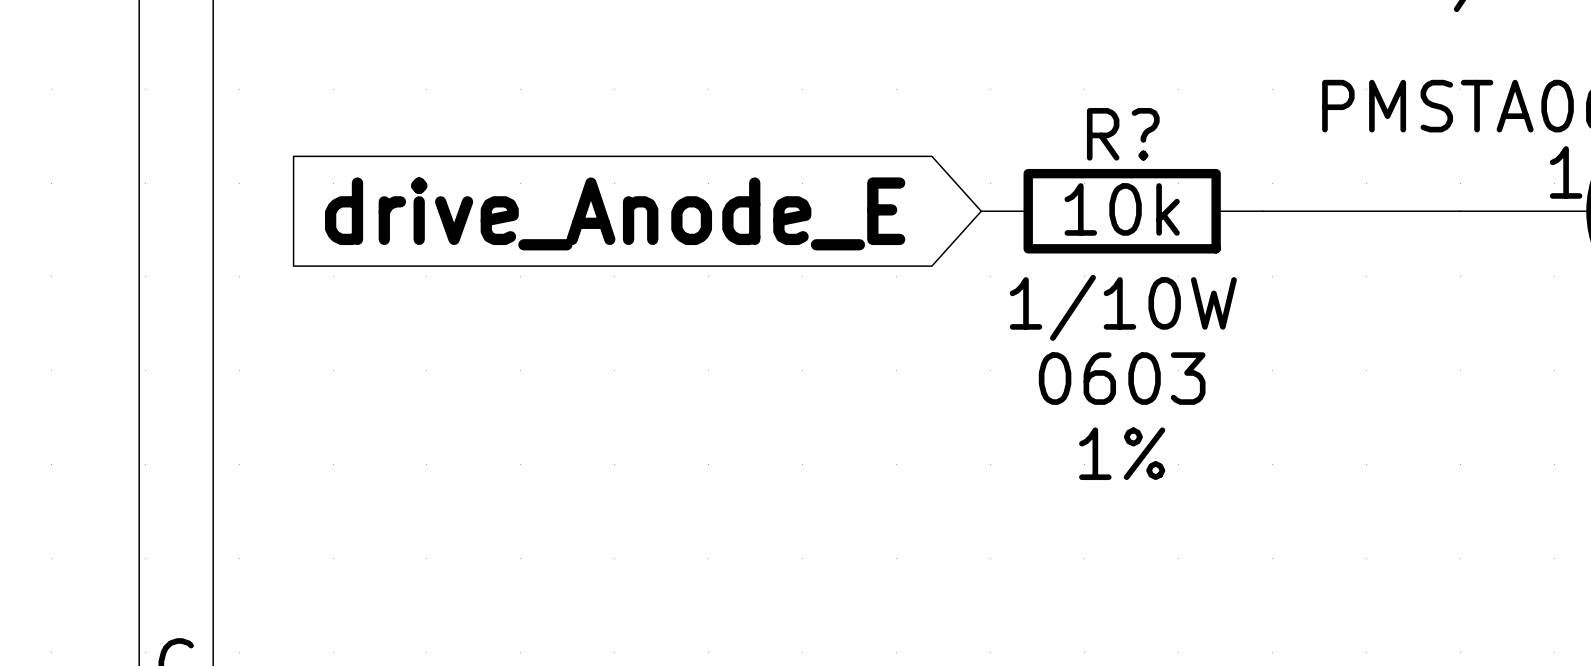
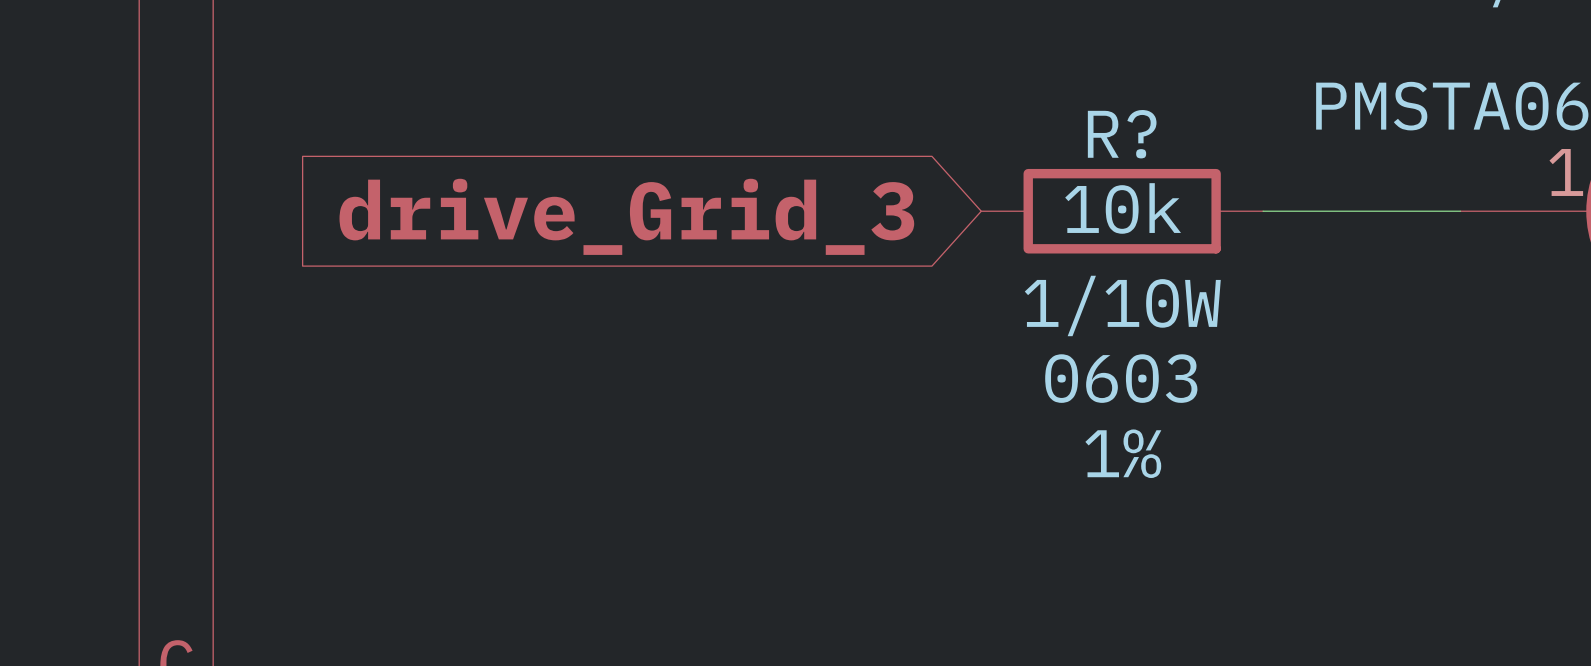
global label: drive_Anode_E (615, 213) -> drive_Grid_3 (626, 216)

